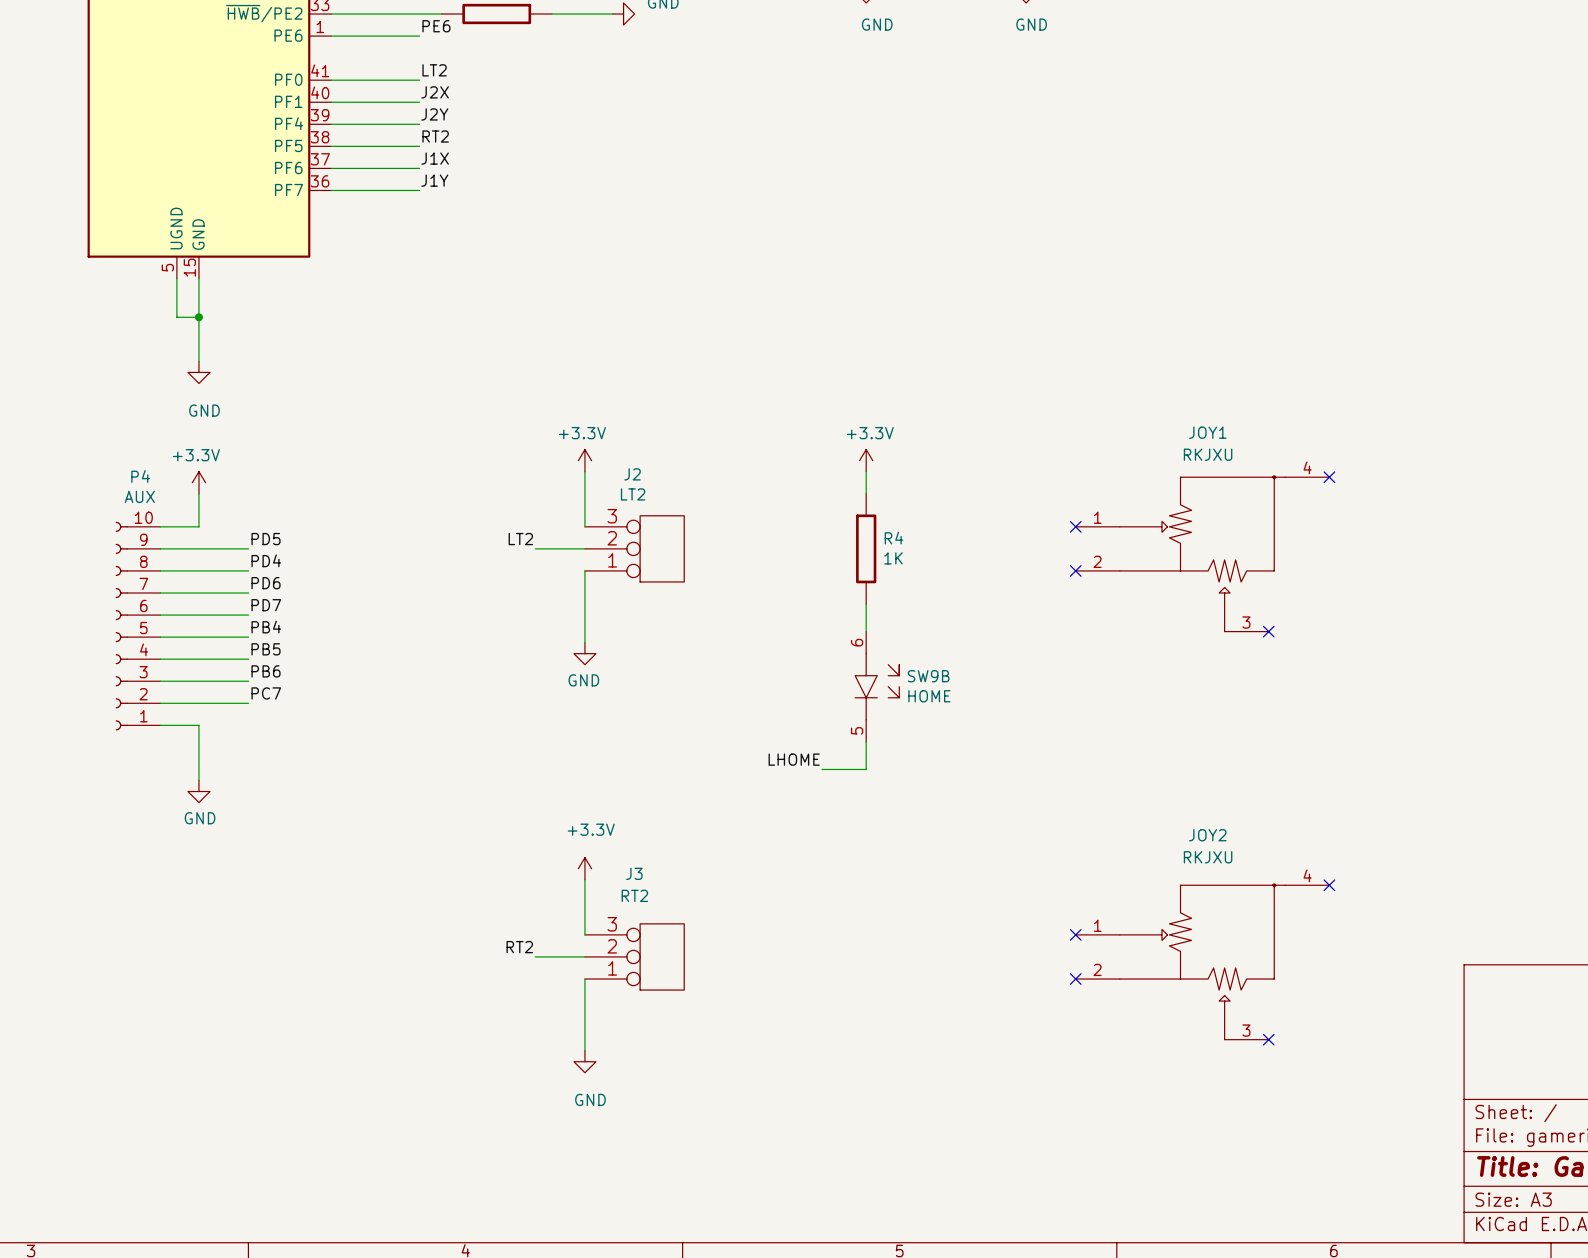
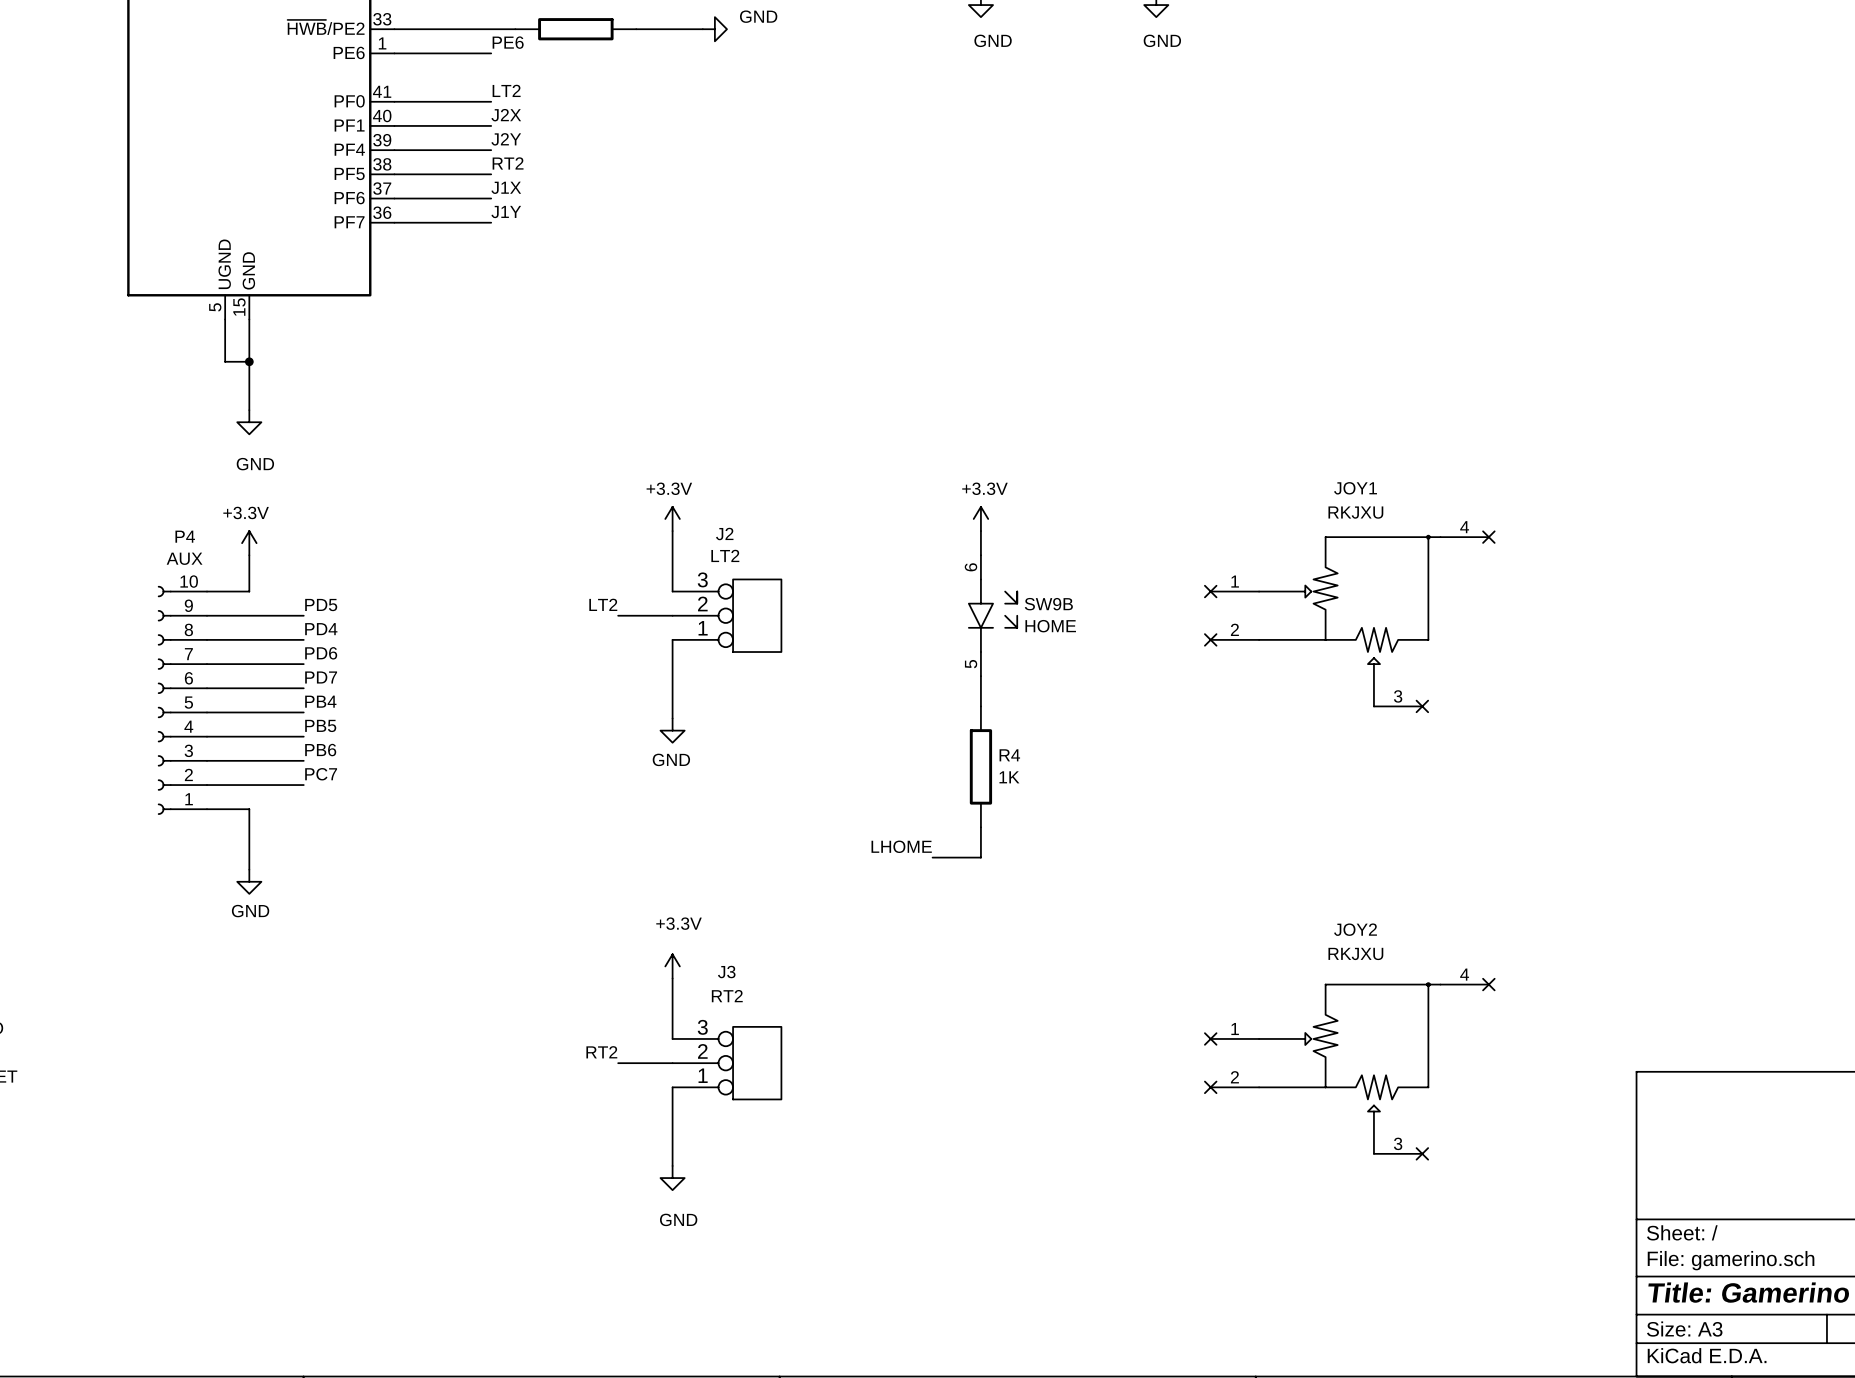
R4 position: (866, 548) -> (980, 766)
SW9B position: (877, 686) -> (993, 615)

